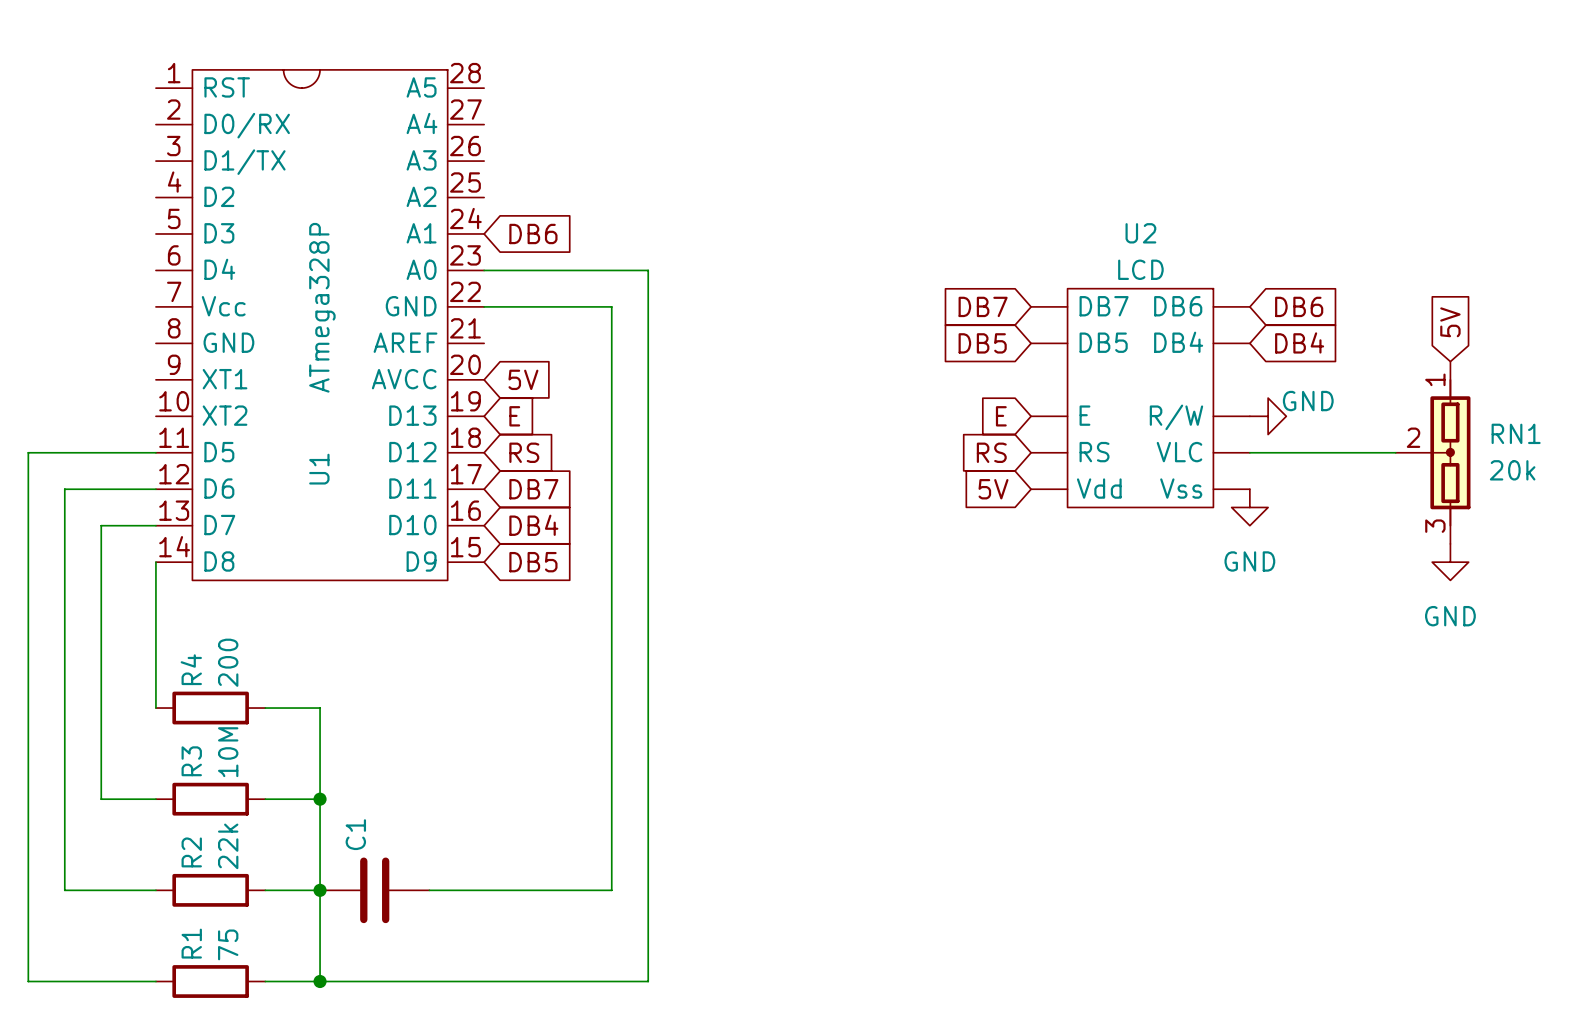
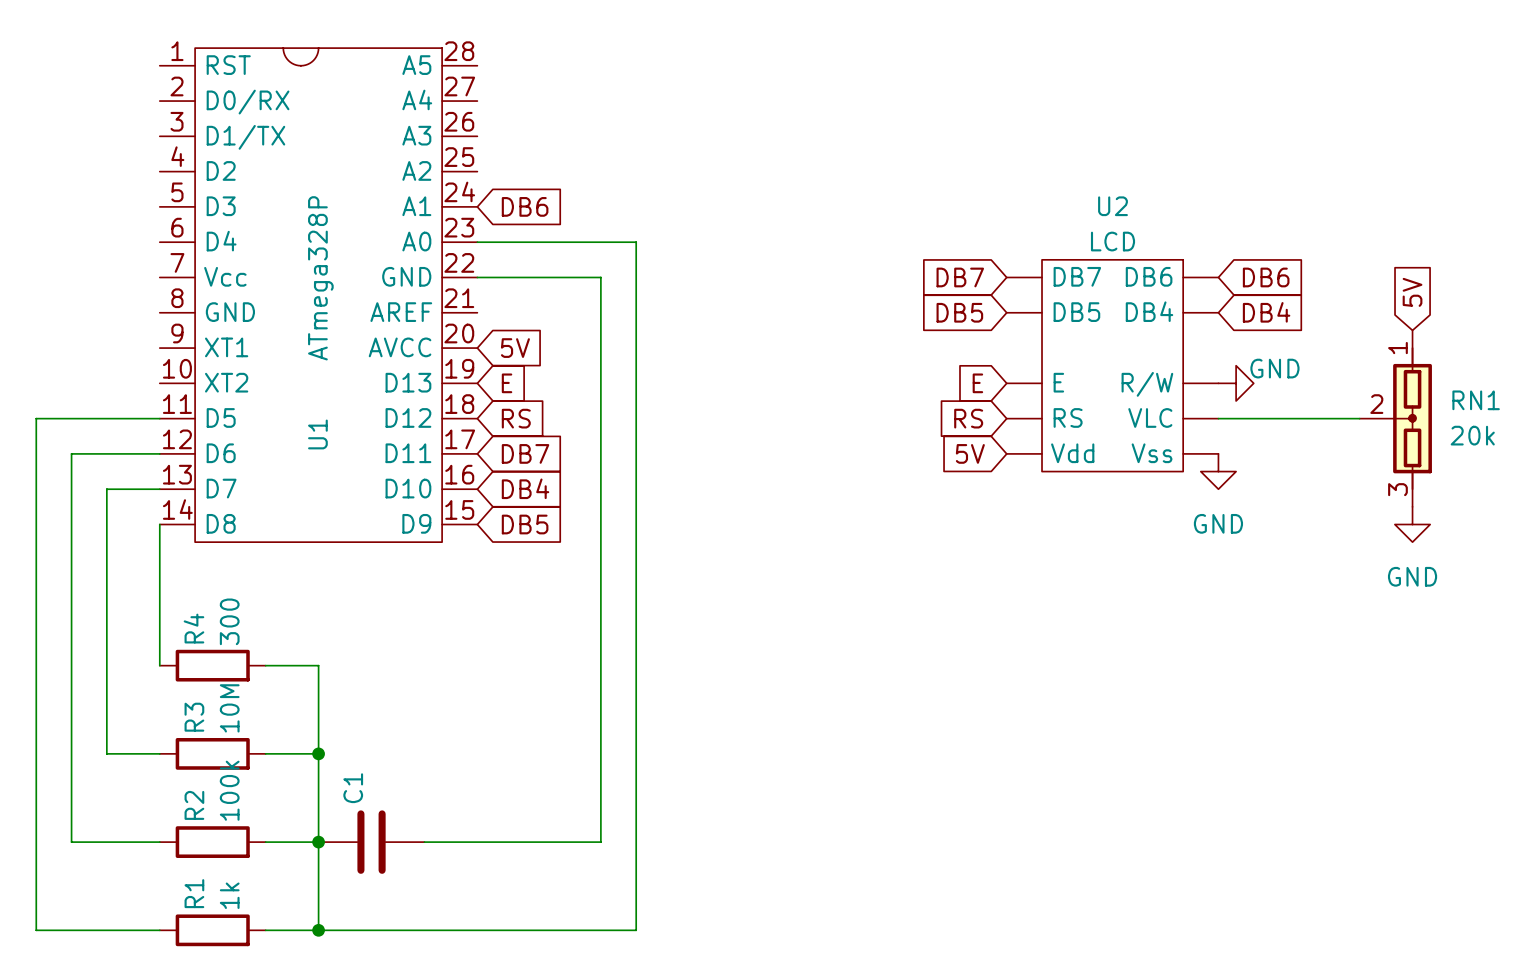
R4 value: 200 (228, 662) -> 300 (229, 621)
R2 value: 22k (228, 846) -> 100k (229, 790)
R1 value: 75 (228, 944) -> 1k (229, 895)

